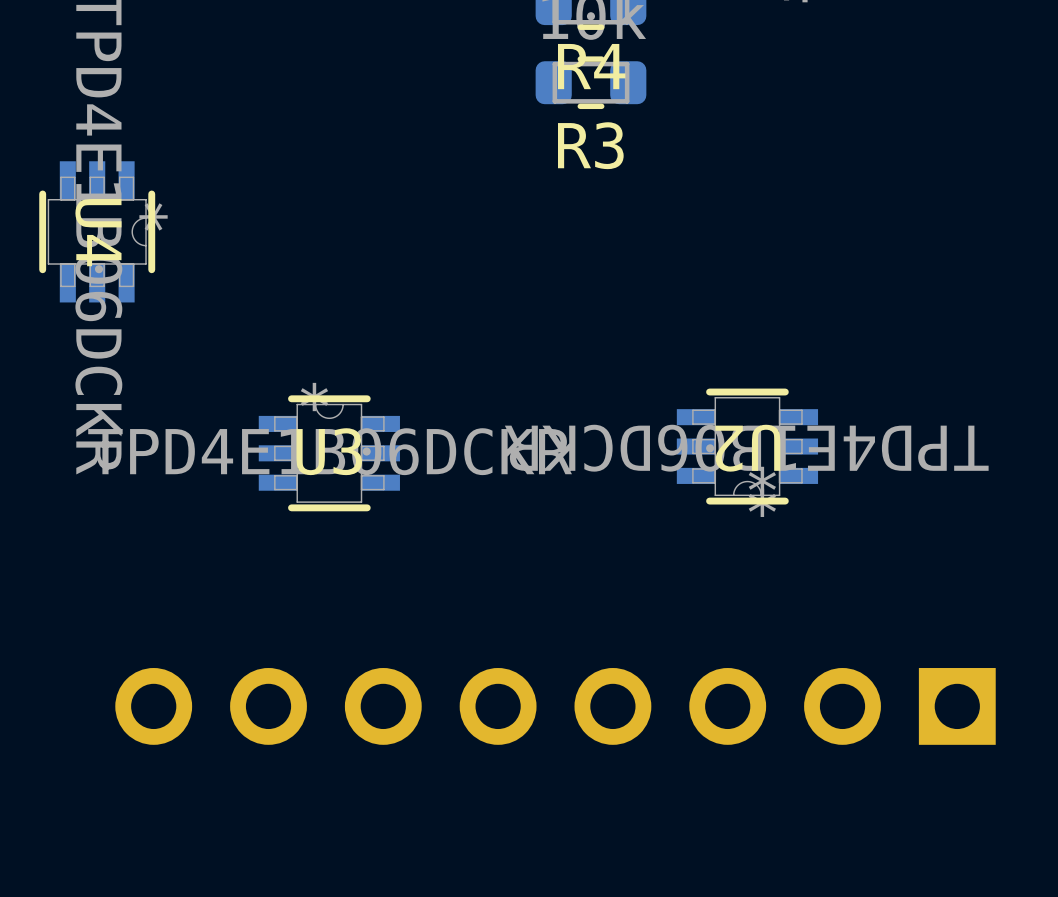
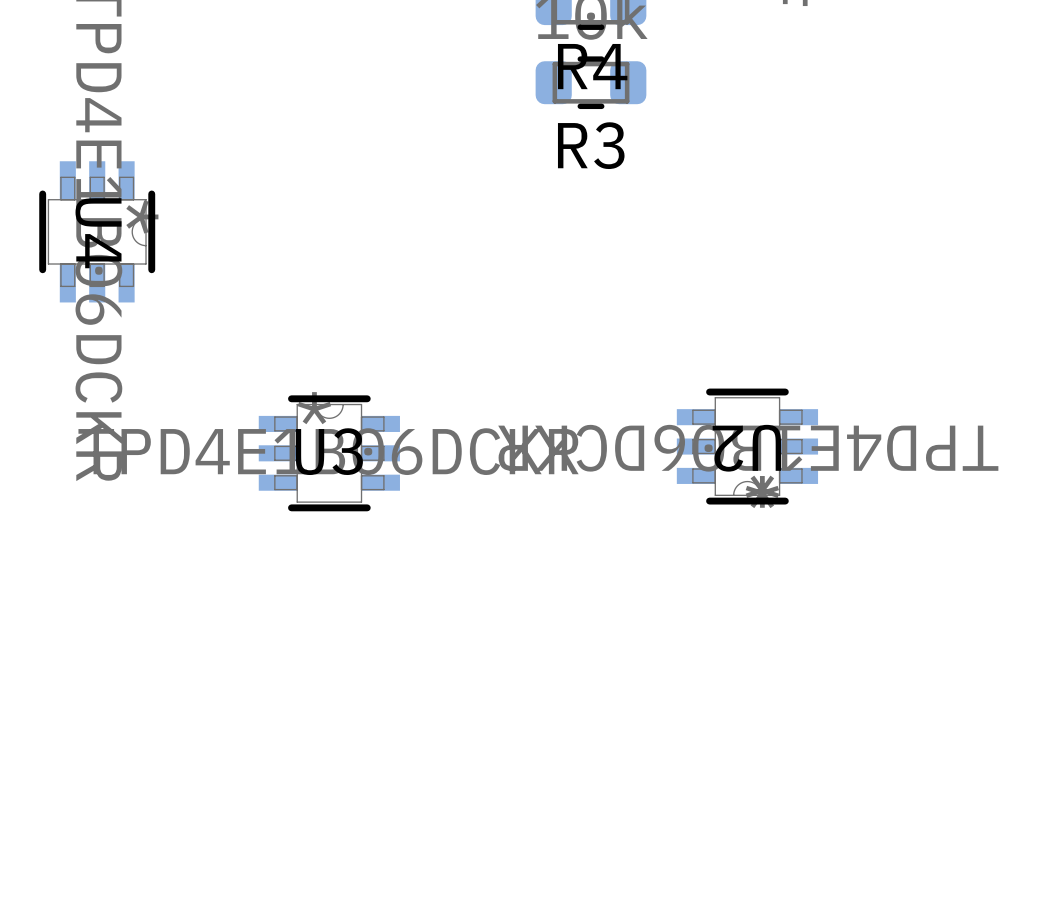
part: (555, 706) -> none

